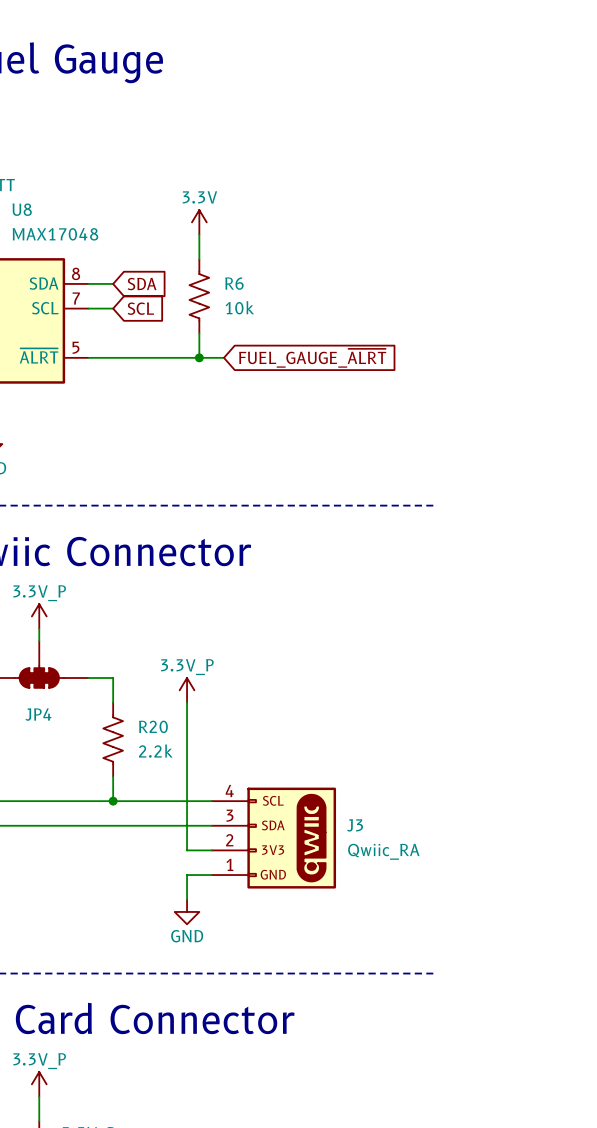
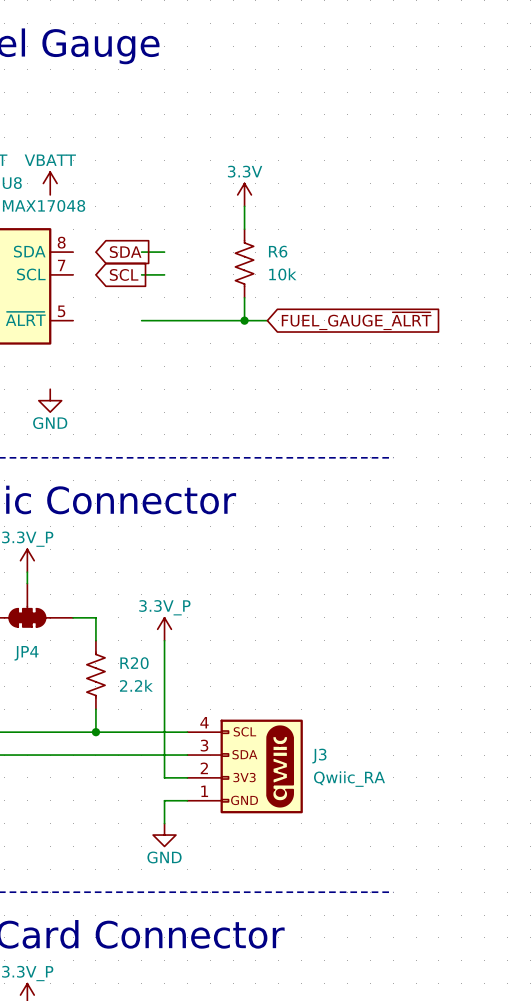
power symbol: none -> VBATT (50, 183)
power symbol position: 3.3V (199, 222) -> 3.3V (244, 194)
wire: (199, 234) (199, 259) -> (244, 206) (244, 229)
wire: (88, 283) (113, 283) -> (141, 252) (164, 252)
R6 position: (199, 296) -> (244, 263)
wire: (88, 308) (113, 308) -> (141, 274) (164, 274)
wire: (199, 333) (199, 357) -> (244, 297) (244, 320)
wire: (88, 357) (162, 357) -> (198, 320) (267, 320)
junction: (199, 357) -> none
junction: none -> (244, 320)
global label position: FUEL_GAUGE_~{ALRT} (312, 358) -> FUEL_GAUGE_~{ALRT} (356, 321)
power symbol: none -> GND (50, 400)

